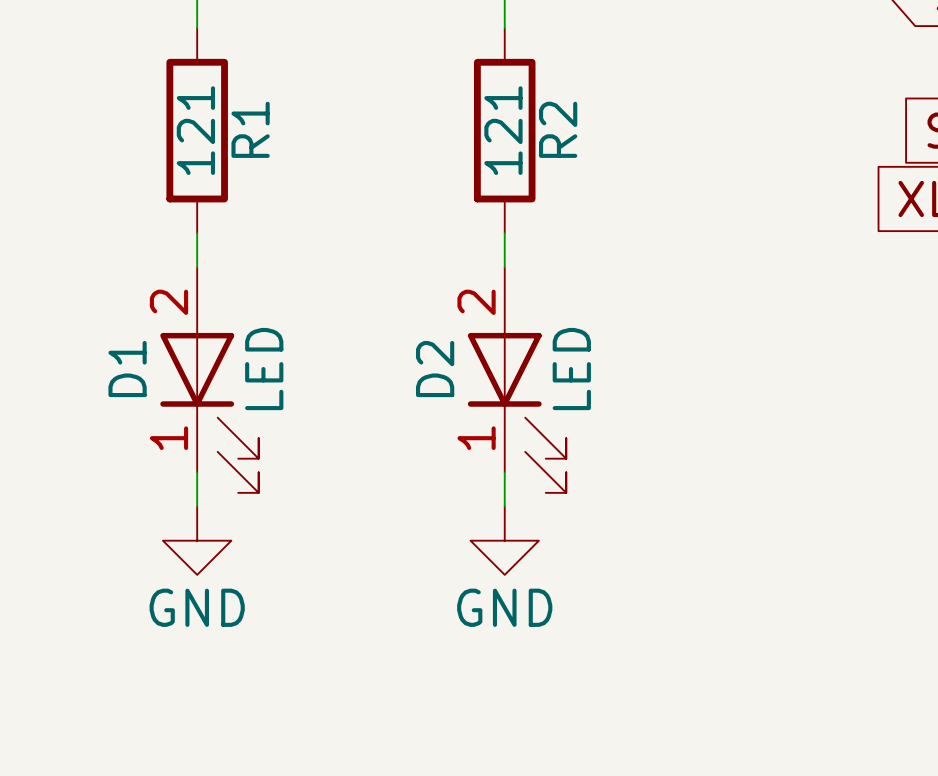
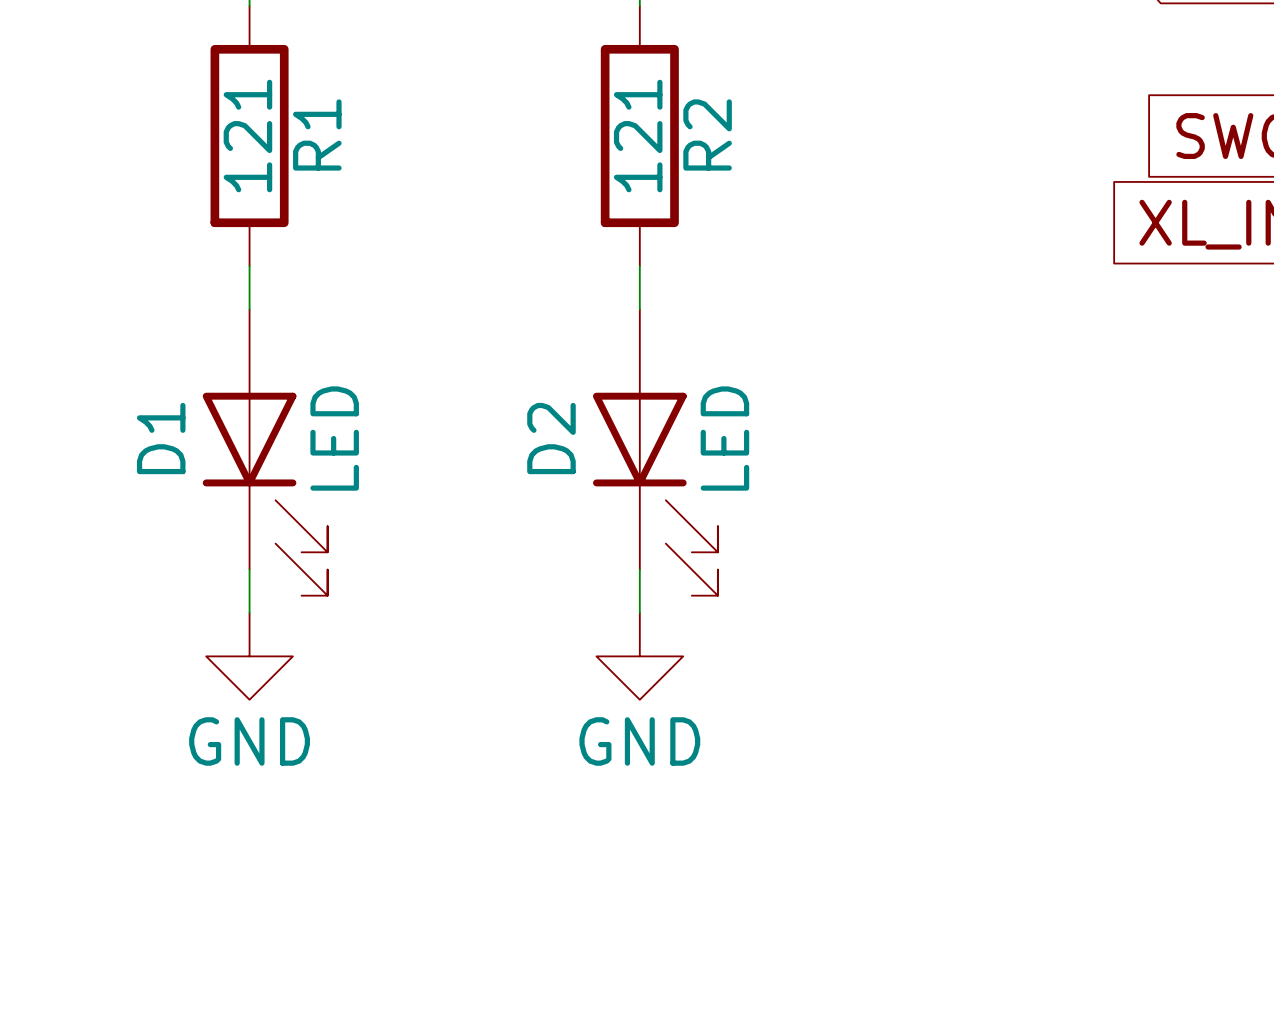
D1 pin number: 2 (168, 302) -> none
D2 pin number: 2 (476, 302) -> none
D1 pin number: 1 (168, 438) -> none
D2 pin number: 1 (476, 438) -> none

